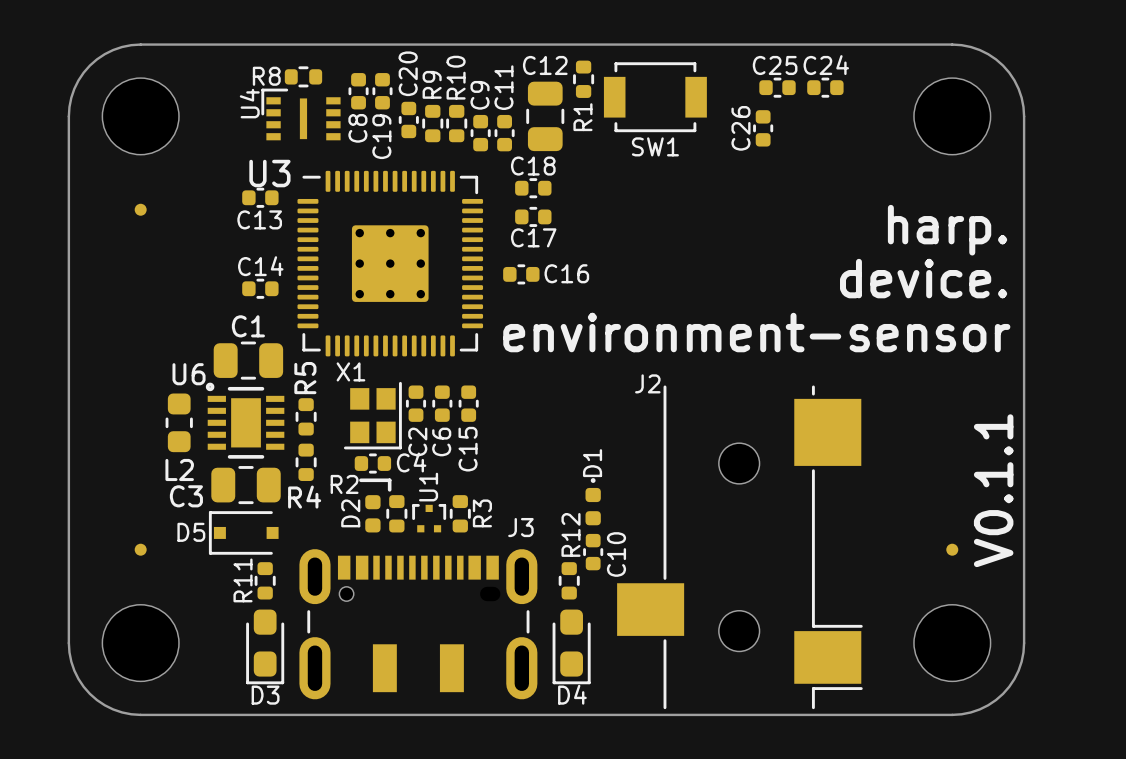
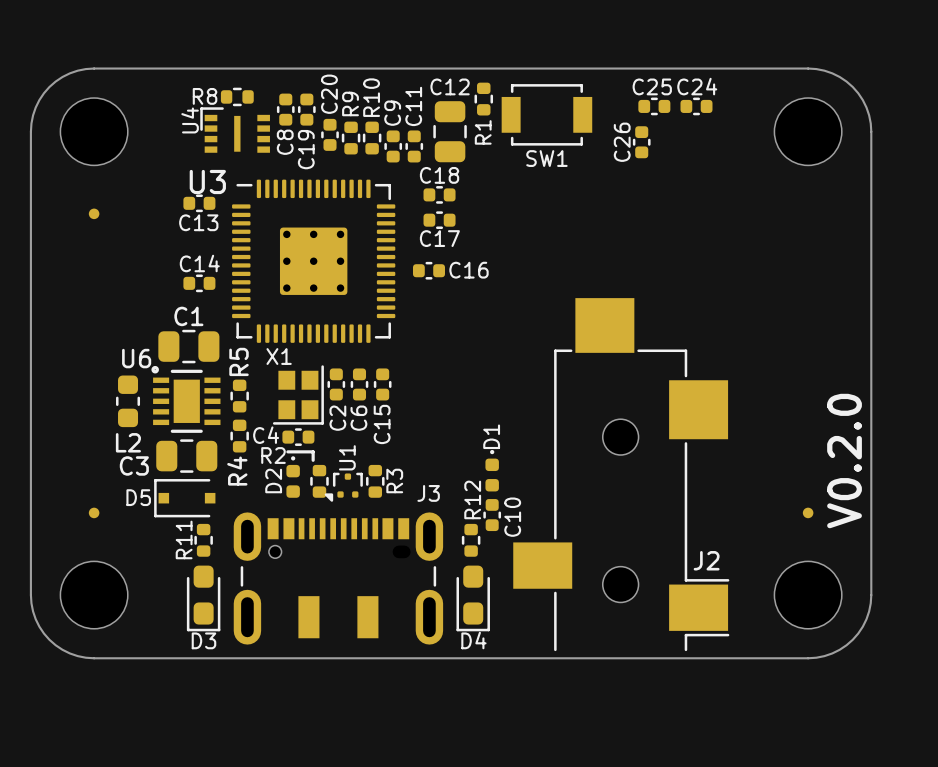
text: harp. (947, 230) -> none
text: device. (923, 278) -> none
text: environment-sensor (756, 332) -> none
J2 name position: J2 (647, 383) -> J2 (706, 560)
J2 footprint: [617, 385, 863, 710] -> [513, 298, 730, 652]
C4 name position: C4 (411, 462) -> C4 (266, 435)
text: V0.1.1 (993, 490) -> V0.2.0 (844, 461)
D2 footprint: [365, 495, 381, 533] -> [286, 456, 300, 498]
R4 name rotation: 0° (304, 497) -> 90° counterclockwise (237, 471)
U1 footprint: [412, 503, 447, 533] -> [324, 472, 363, 502]

